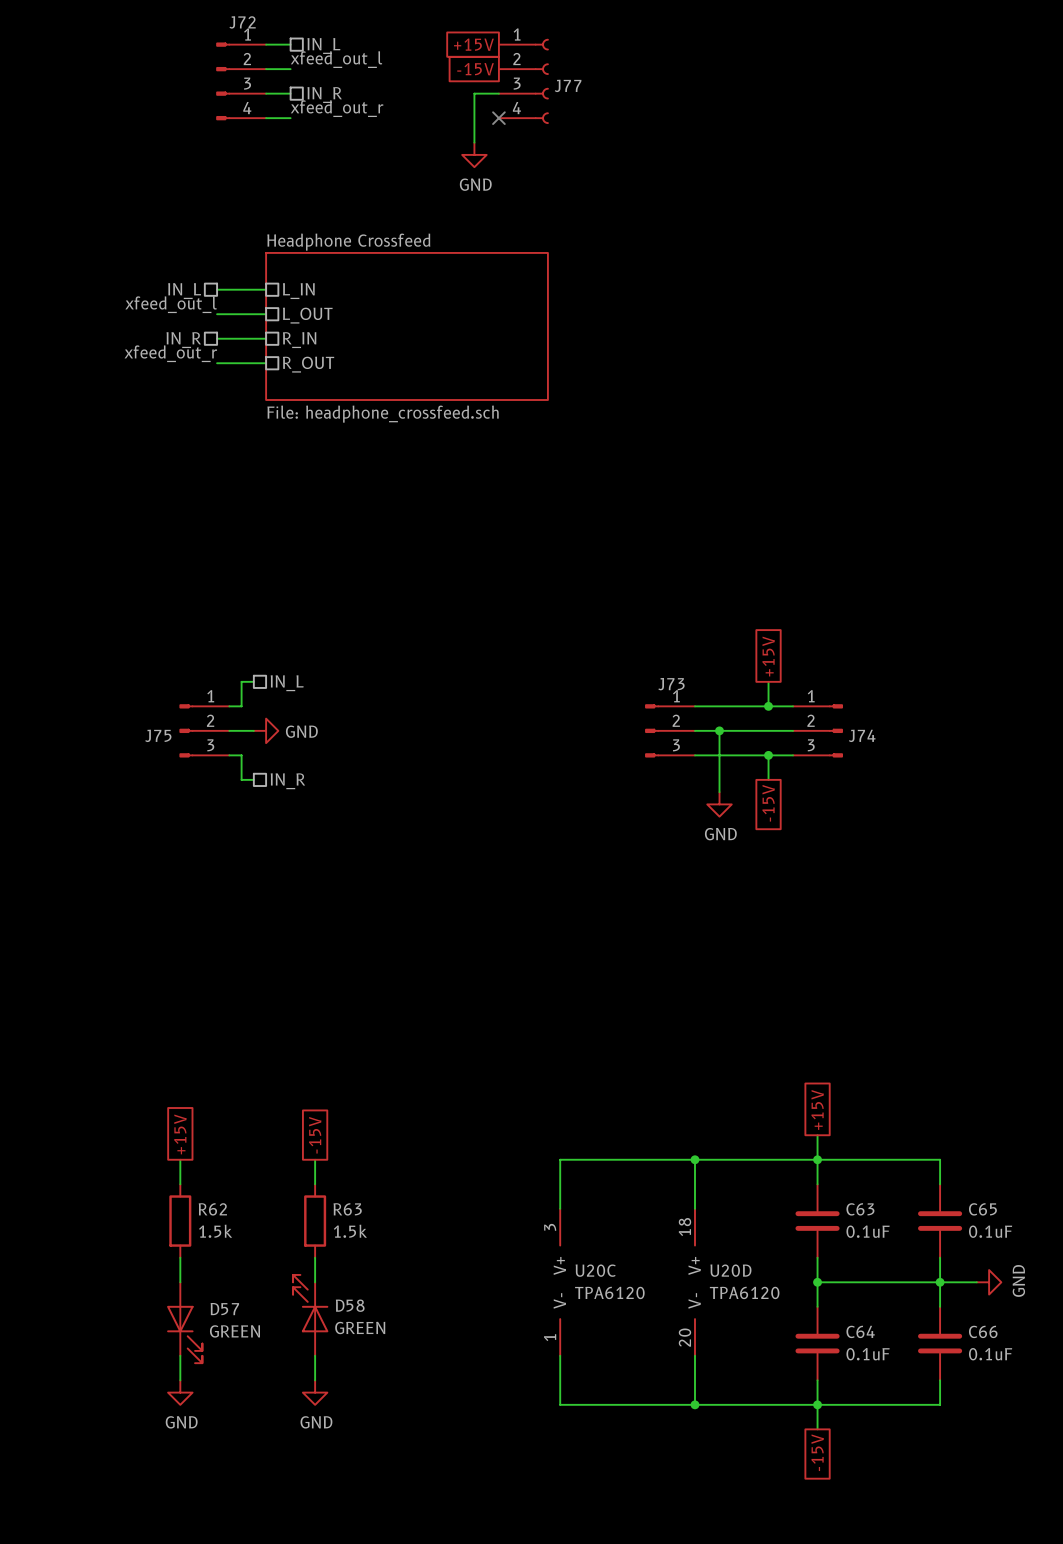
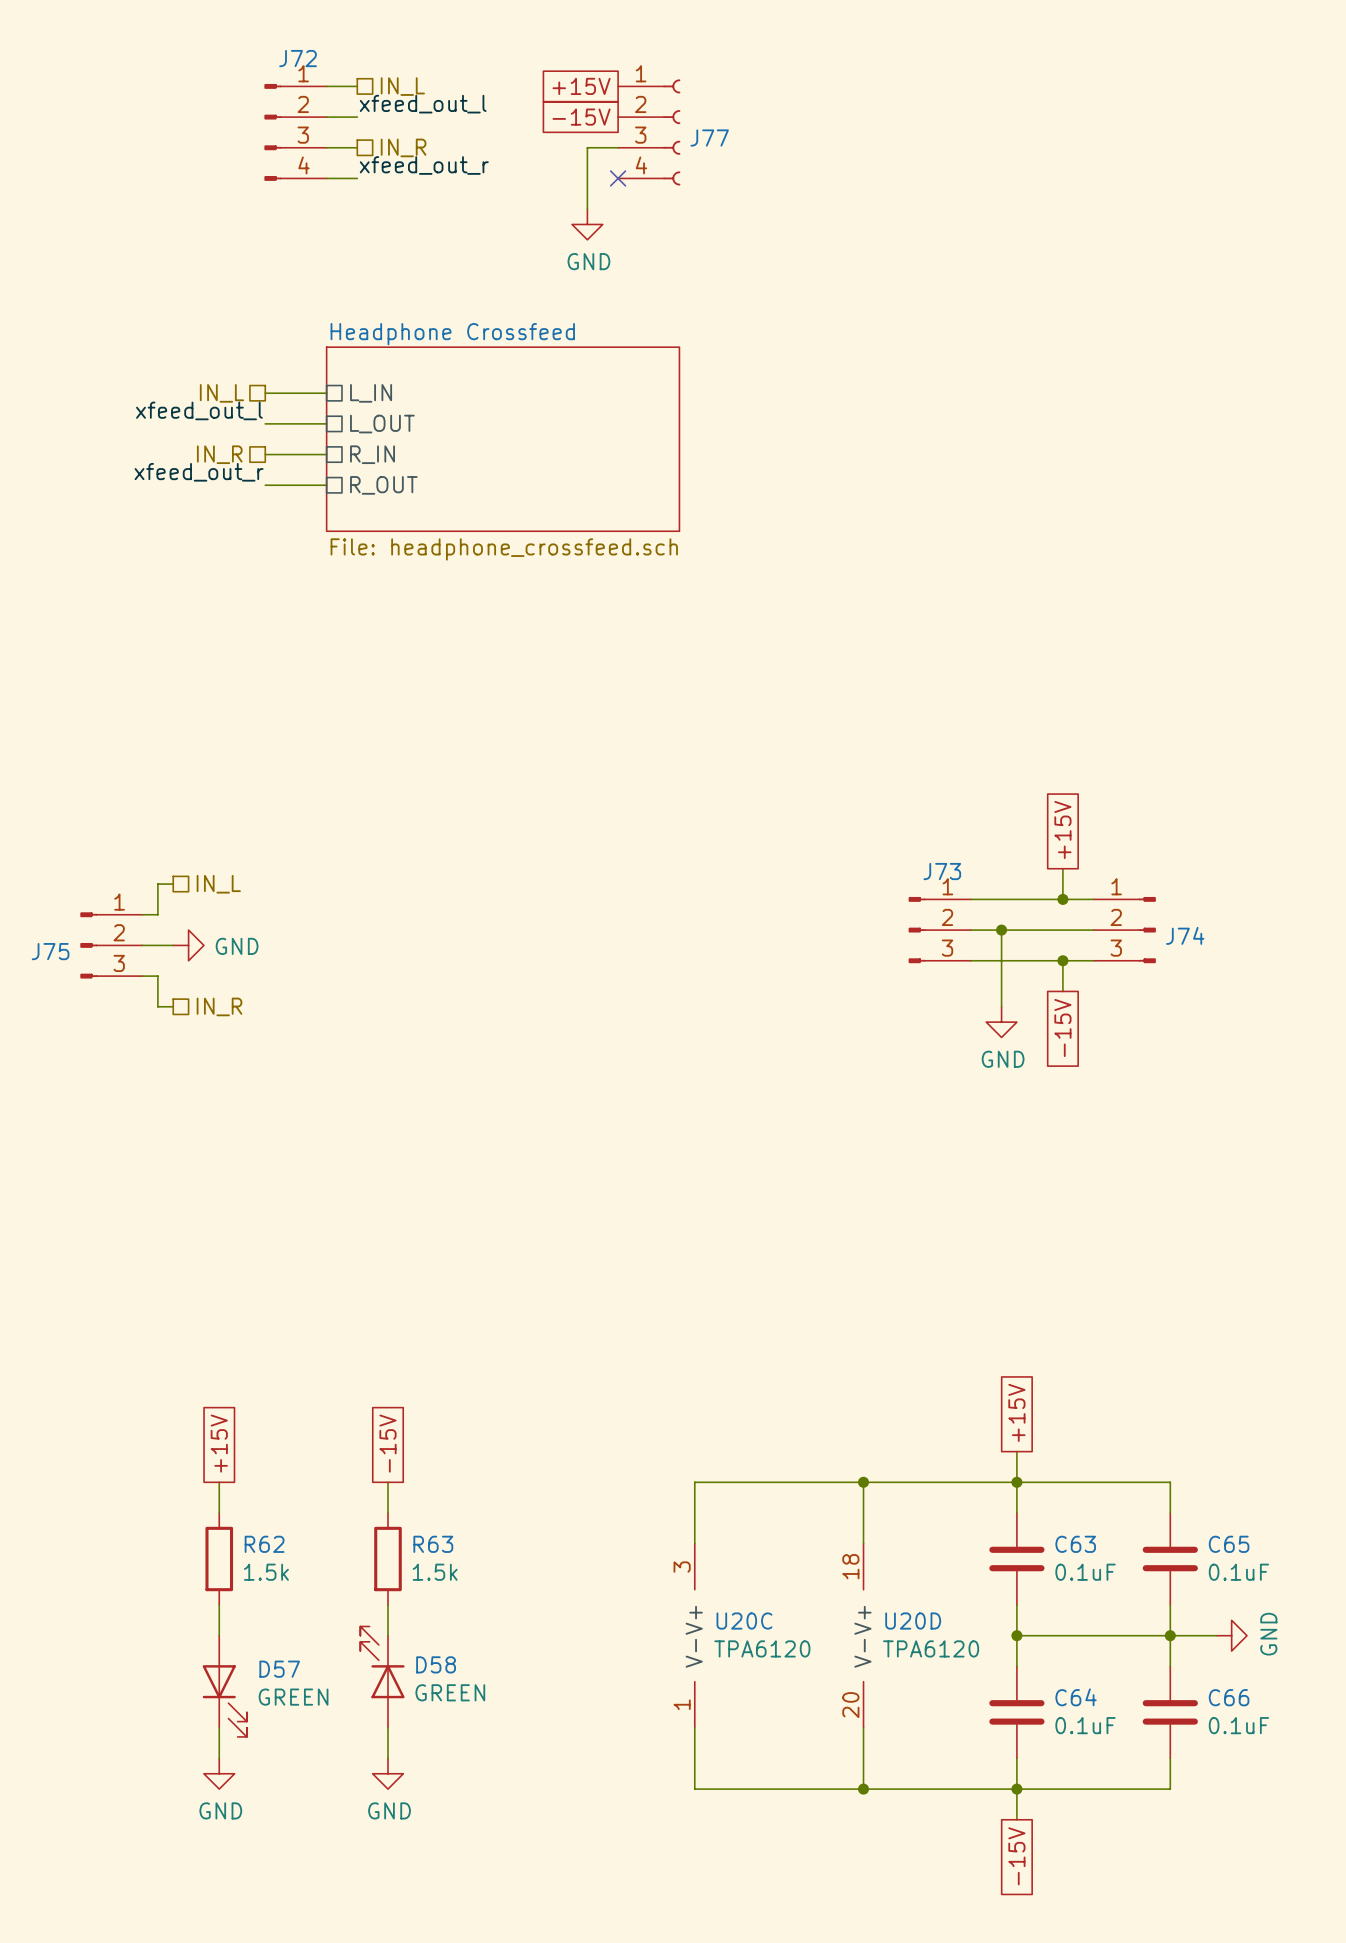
global label position: +15V (768, 656) -> +15V (1062, 829)
wire: (253, 681) (241, 681) (241, 706) (229, 706) -> (173, 884) (157, 884) (157, 914) (142, 914)
wire: (768, 681) (768, 706) -> (1062, 868) (1062, 899)
hierarchical label position: IN_L (287, 683) -> IN_L (218, 884)
junction: none -> (1062, 899)
wire: (695, 706) (793, 706) -> (970, 899) (1093, 899)
junction: (768, 706) -> none
junction: none -> (1001, 930)
J75 position: (204, 730) -> (111, 945)
wire: (229, 730) (253, 730) -> (142, 945) (173, 945)
power symbol position: GND (266, 730) -> GND (188, 945)
J73 position: (670, 730) -> (939, 930)
wire: (695, 730) (793, 730) -> (970, 930) (1093, 930)
wire: (719, 730) (719, 792) -> (1001, 930) (1001, 1006)
junction: (719, 730) -> none
J74 position: (817, 730) -> (1124, 930)
junction: none -> (1062, 960)
wire: (229, 755) (241, 755) (241, 779) (253, 779) -> (142, 976) (157, 976) (157, 1006) (173, 1006)
wire: (695, 755) (793, 755) -> (970, 960) (1093, 960)
wire: (768, 755) (768, 779) -> (1062, 960) (1062, 991)
junction: (768, 755) -> none
hierarchical label position: IN_R (287, 781) -> IN_R (219, 1006)
global label position: -15V (768, 803) -> -15V (1062, 1027)
power symbol position: GND (719, 804) -> GND (1001, 1022)

